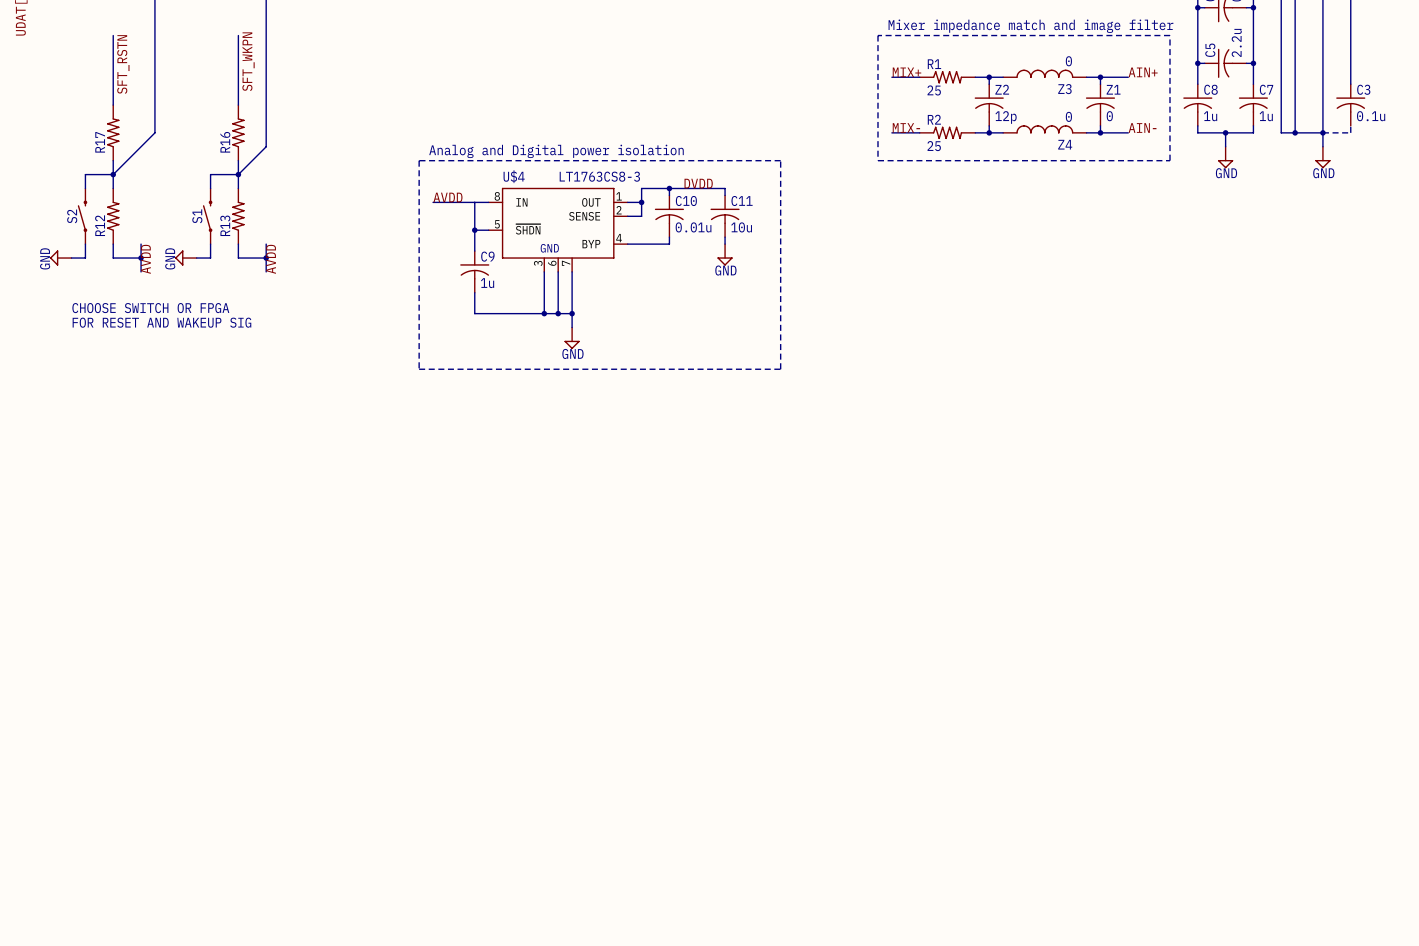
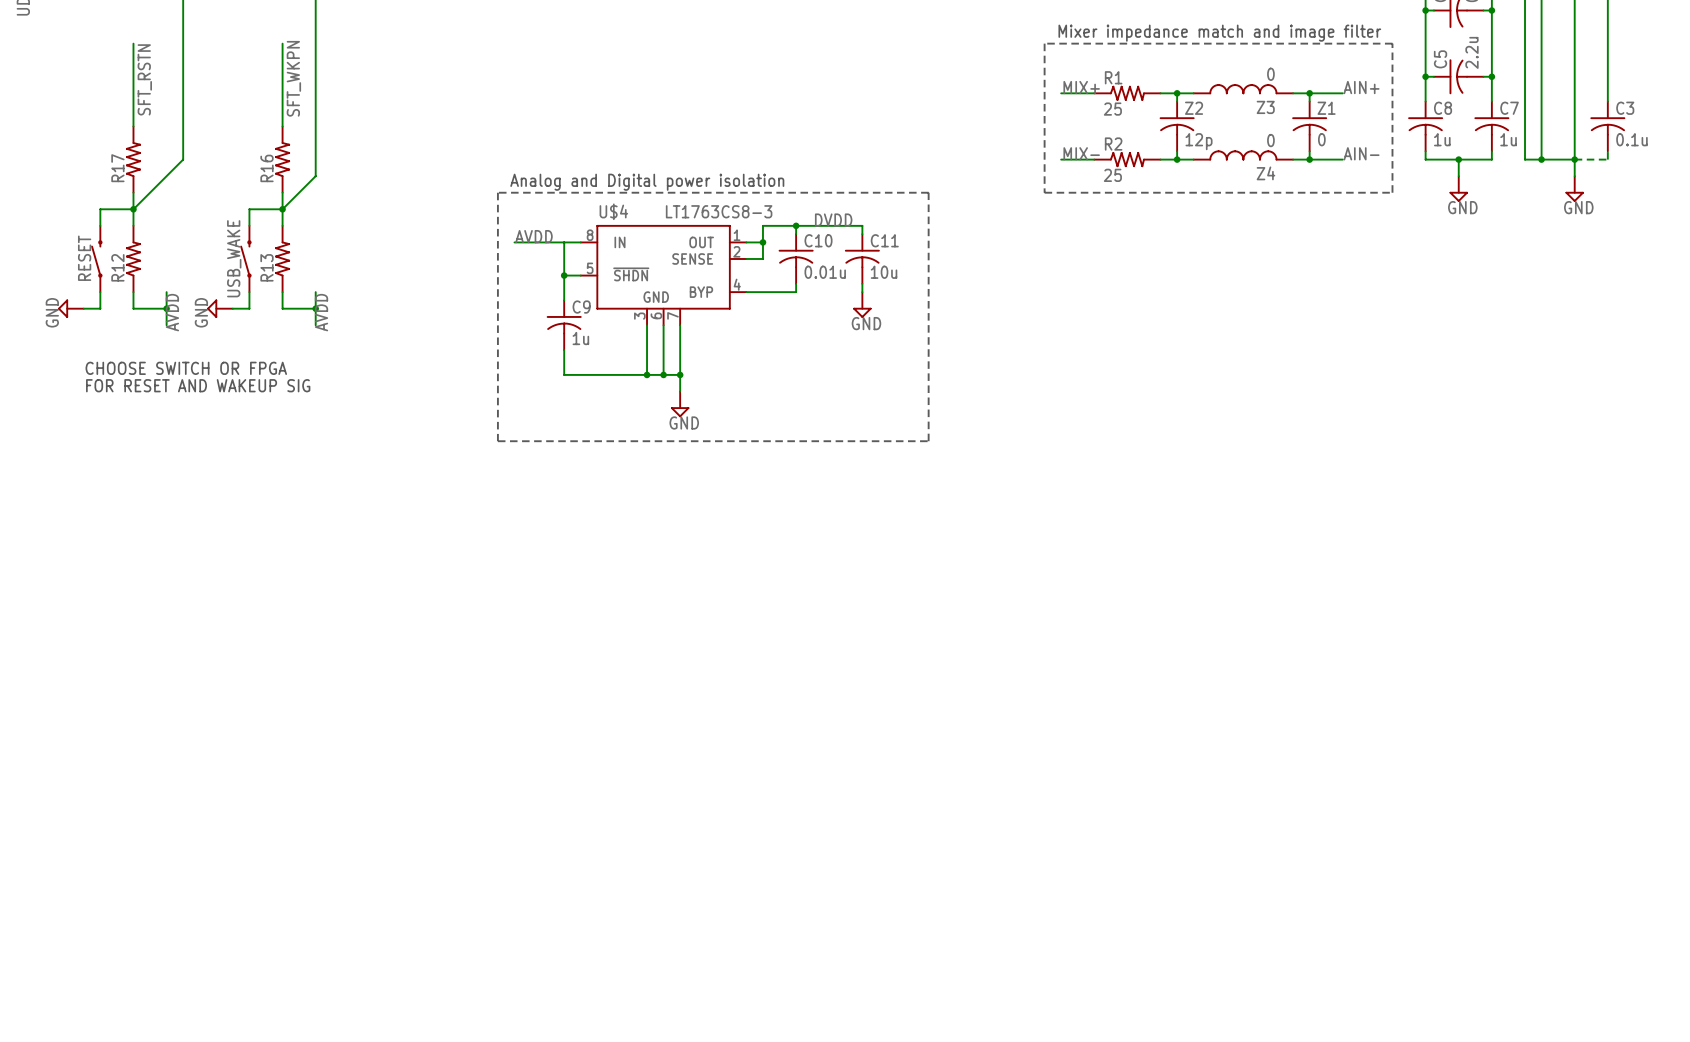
S2 name: S2 (72, 216) -> RESET (84, 258)
S1 name: S1 (197, 216) -> USB_WAKE (234, 258)

